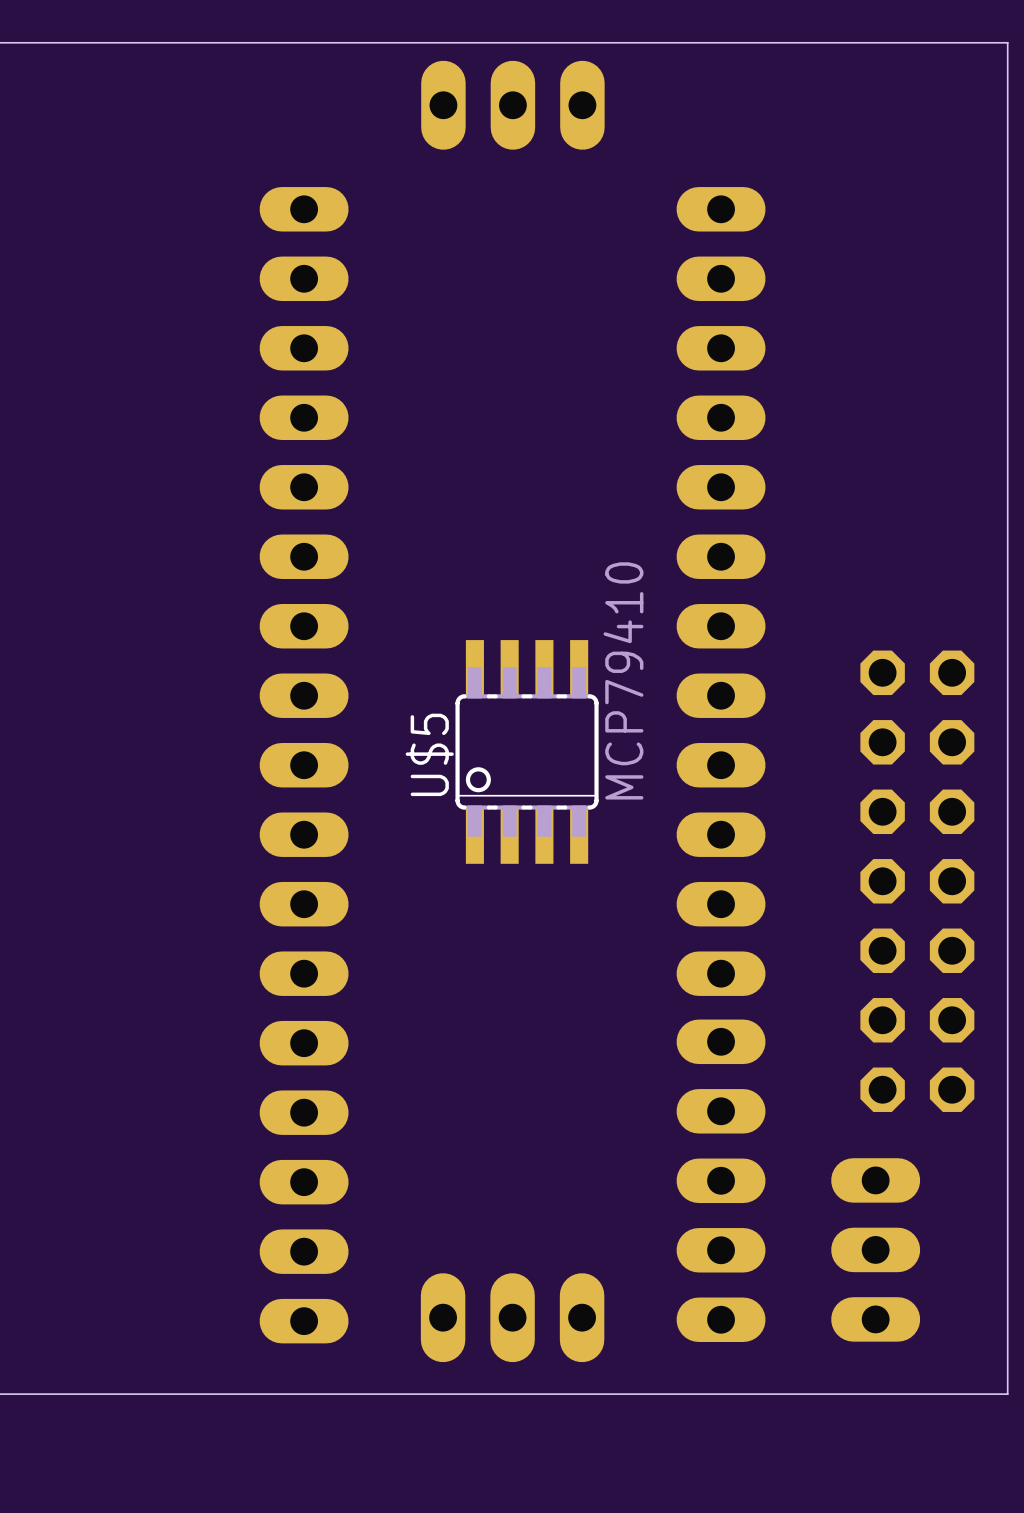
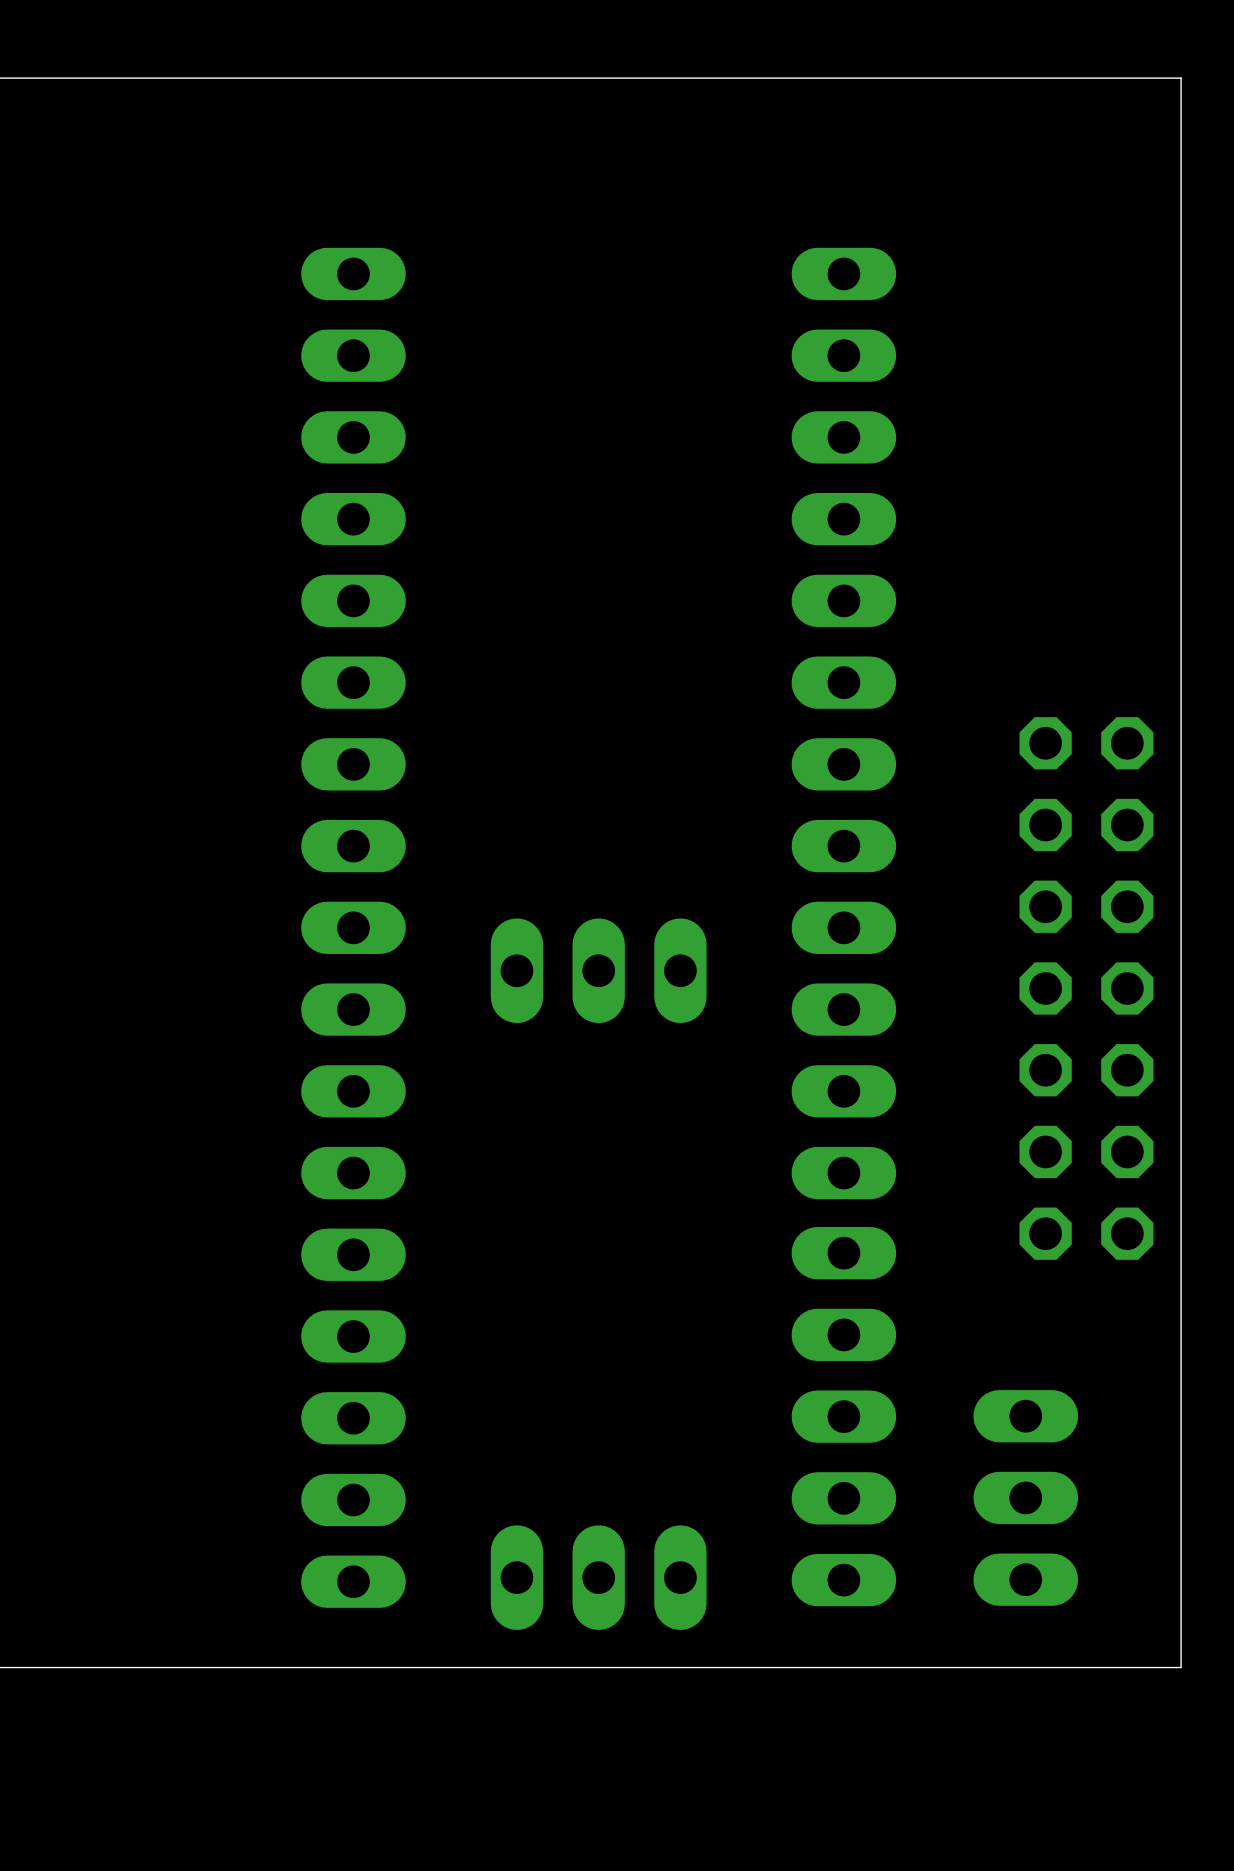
part: (512, 105) -> none
U$5: MCP79410 (527, 751) -> none
part: none -> (598, 970)
part position: (917, 881) -> (1086, 988)

